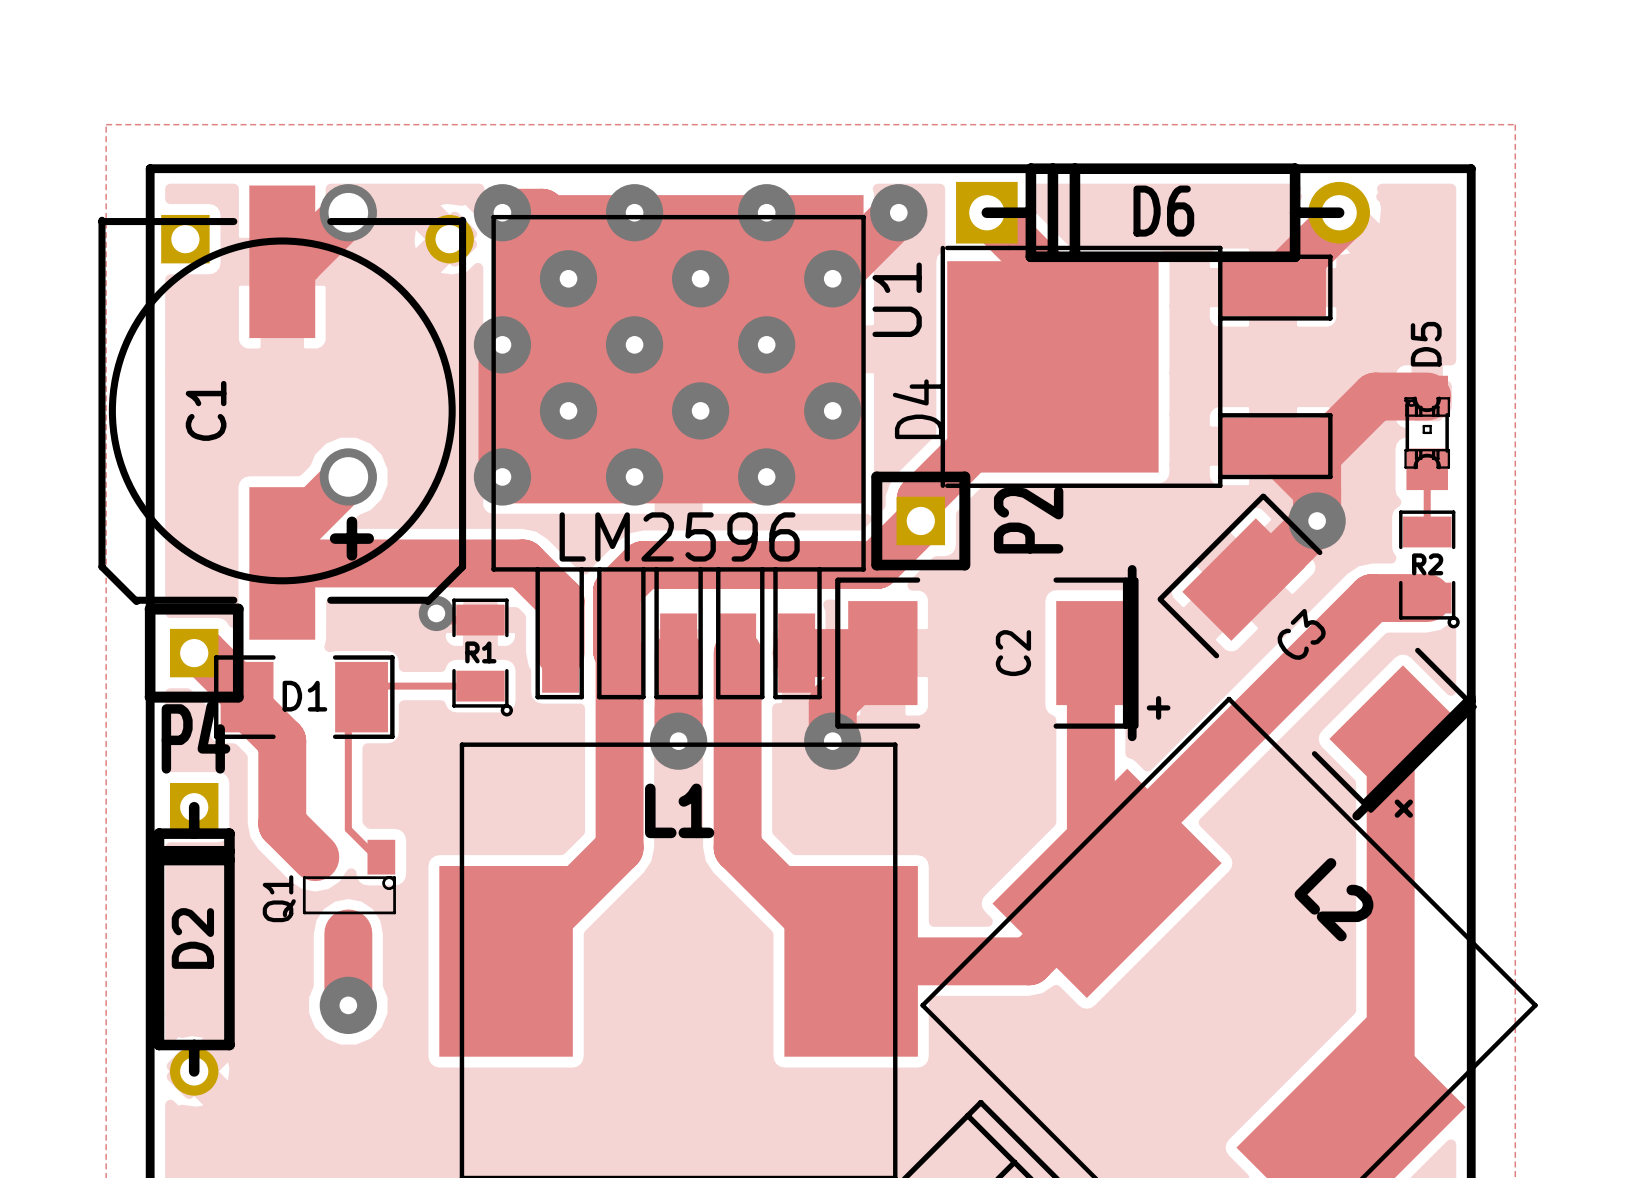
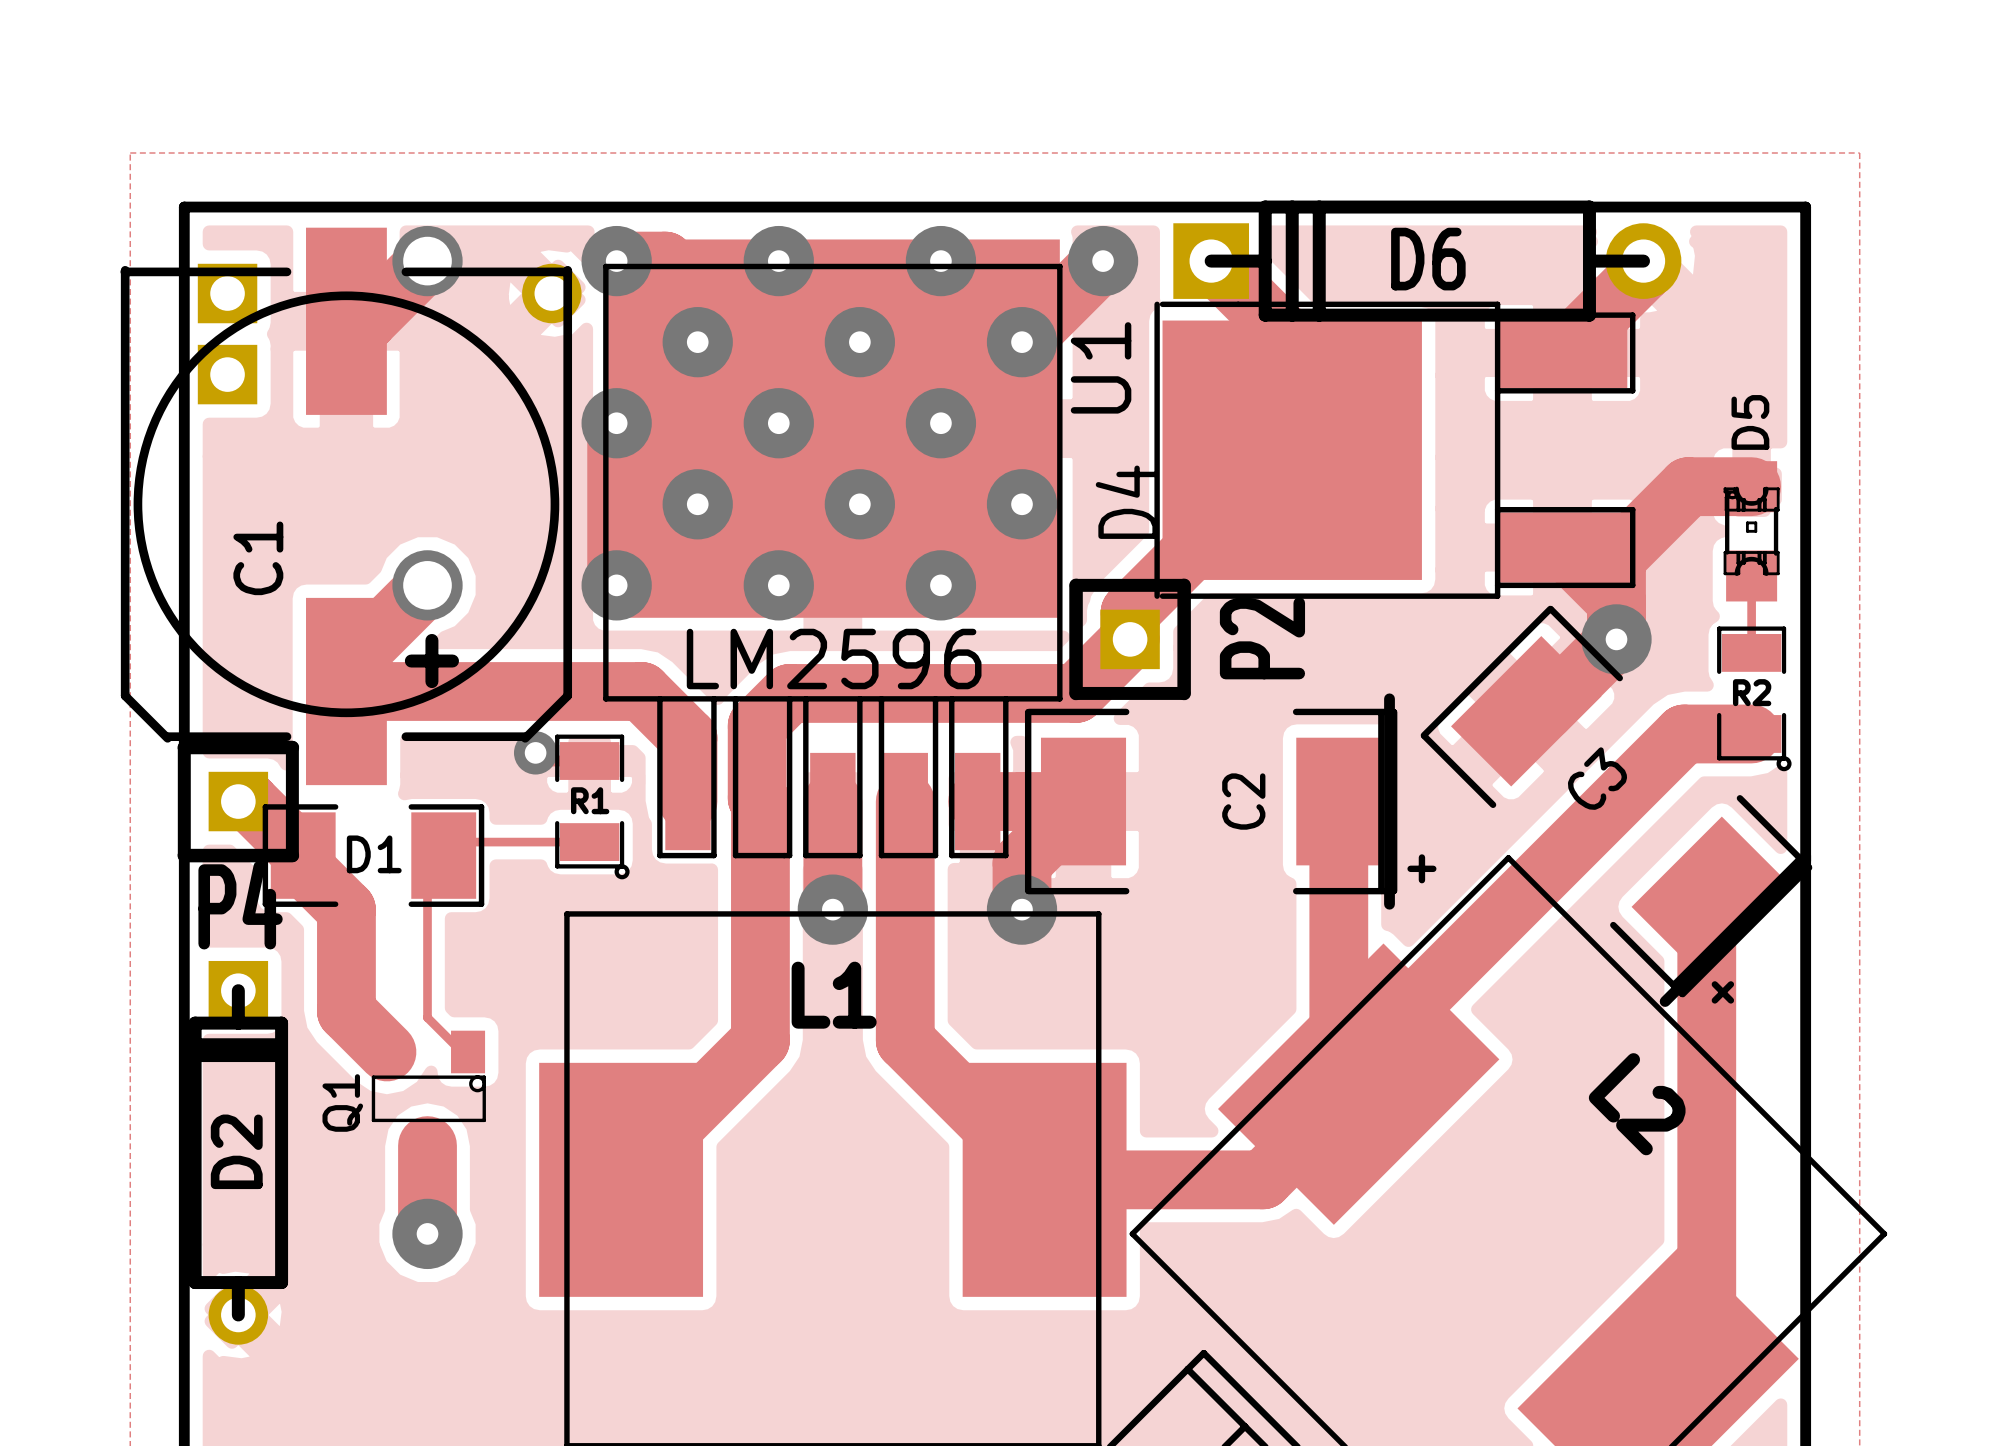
part: none -> (227, 374)
C1 name position: C1 (206, 410) -> C1 (258, 558)

